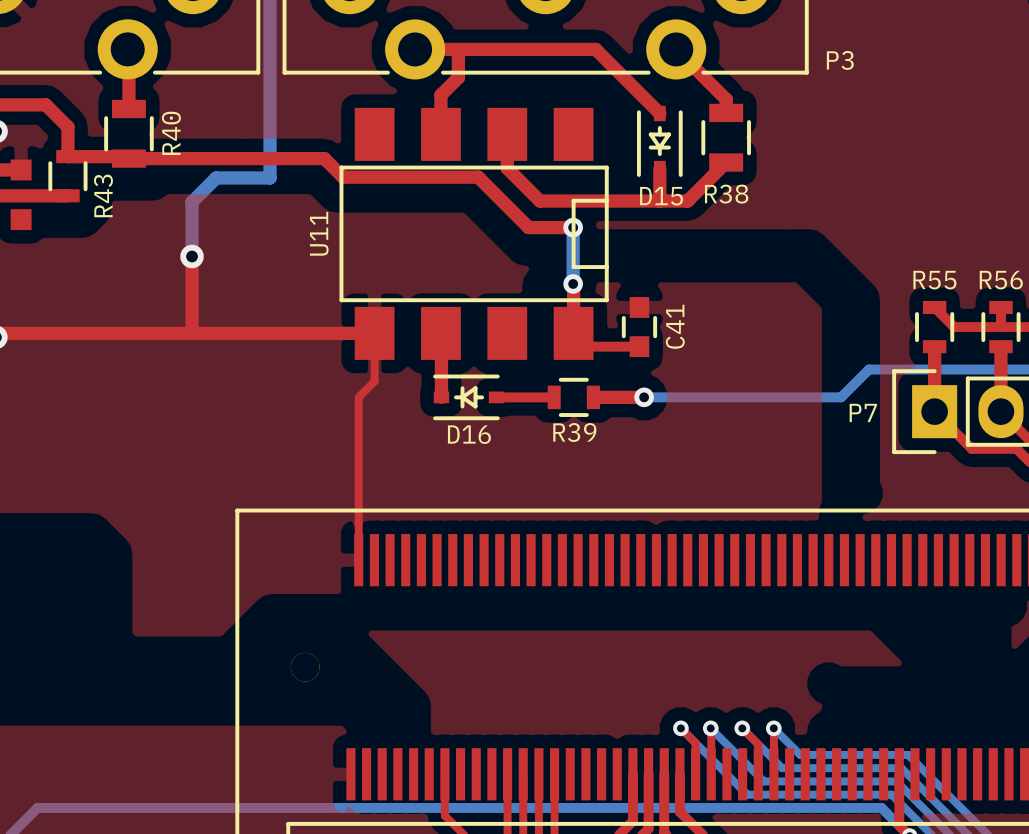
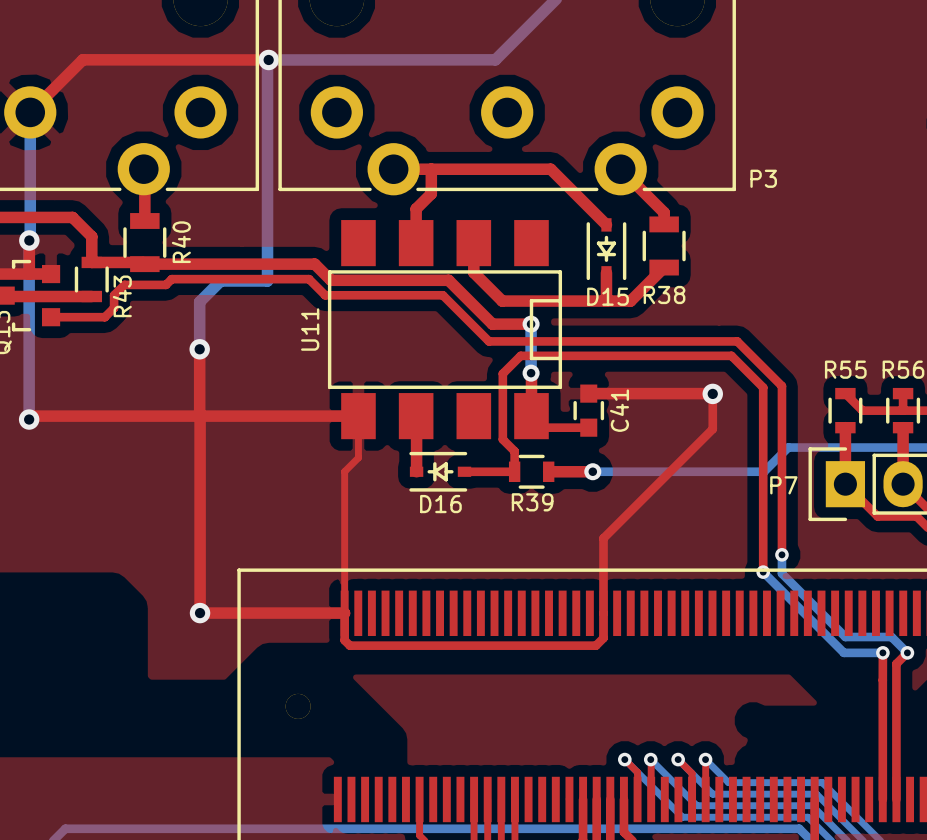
top track: none -> (51, 317) (104, 317) (114, 307) (114, 295) (124, 284) (166, 284) (171, 279) (309, 279) (325, 295) (442, 295) (488, 341) (737, 341) (781, 386) (781, 554)
top track: none -> (588, 393) (712, 392) (712, 429) (603, 538) (603, 638) (595, 645) (349, 645) (344, 640) (344, 613)
via: none -> (712, 393)
top track: none -> (200, 416) (200, 613) (344, 613)
top track: none -> (514, 471) (514, 451) (502, 439) (502, 373) (520, 355) (731, 355) (763, 387) (763, 572)
bottom track: none -> (781, 554) (781, 573) (845, 637) (891, 637) (907, 652)
via: none -> (781, 554)
bottom track: none -> (763, 572) (843, 652) (882, 652)
via: none -> (763, 572)
via: none -> (200, 613)
top track: none -> (882, 652) (882, 799)
via: none -> (882, 652)
top track: none -> (907, 652) (896, 663) (896, 799)
via: none -> (907, 652)

